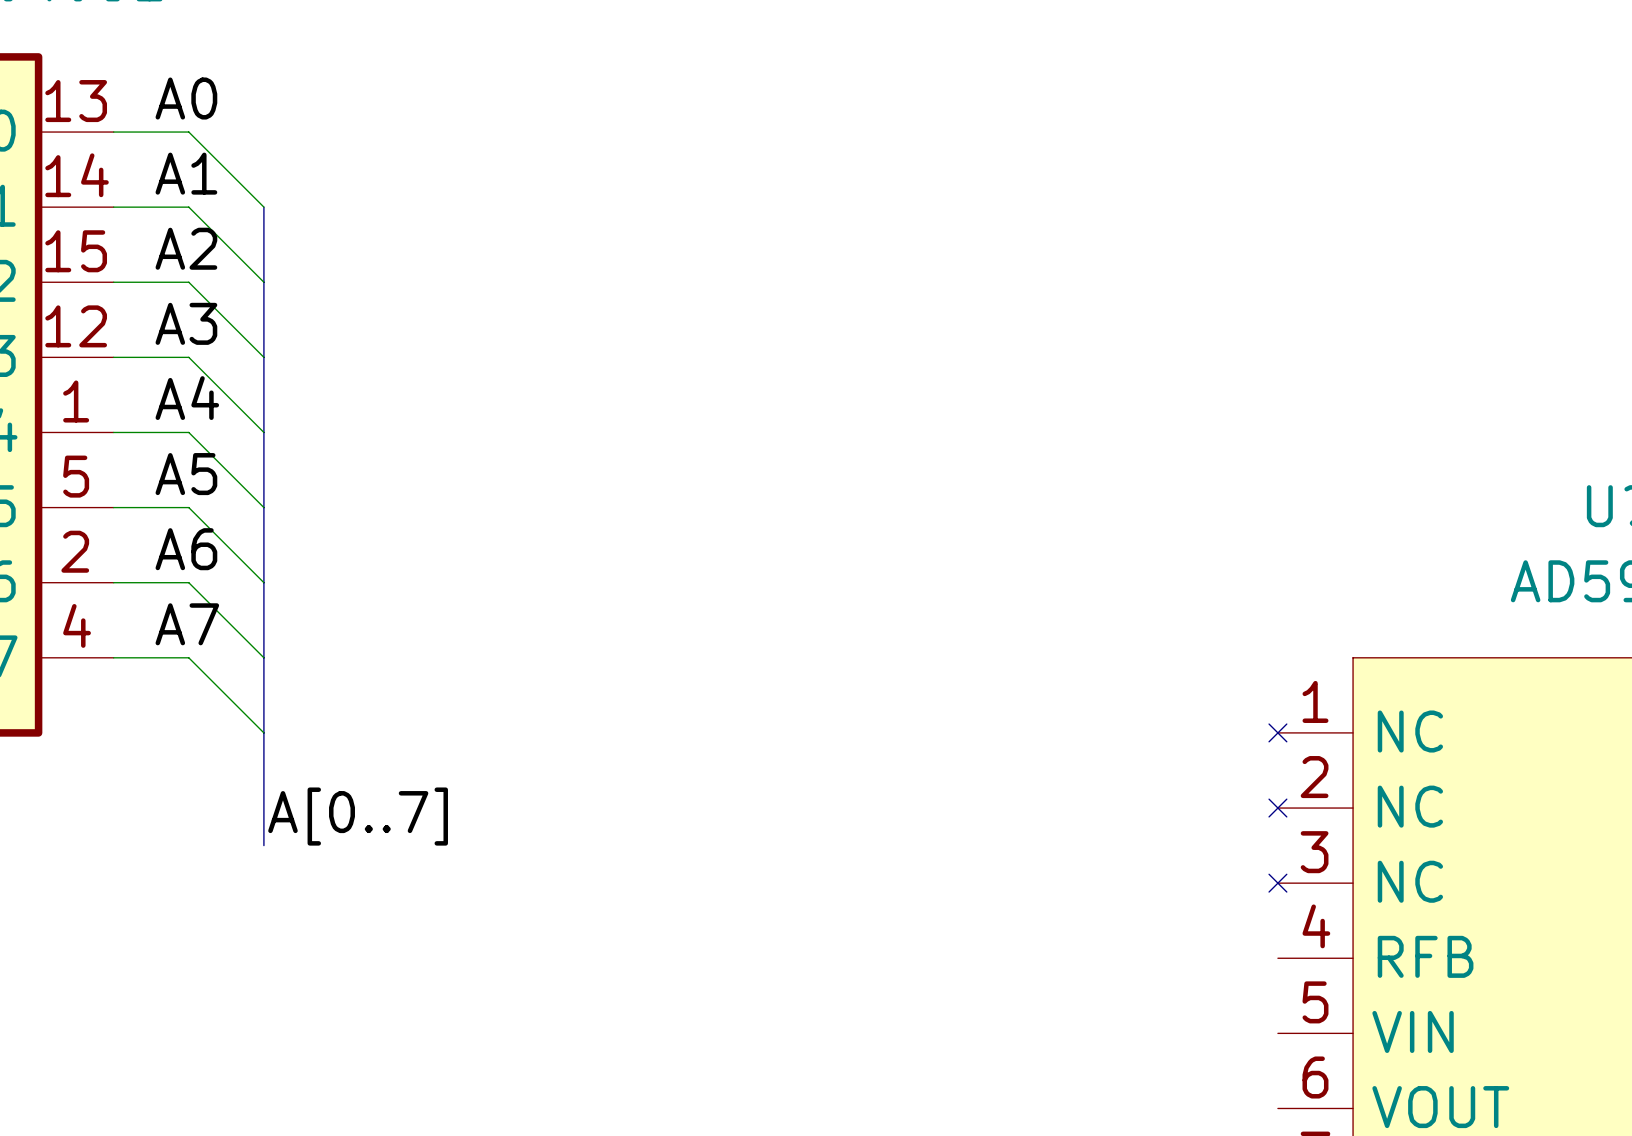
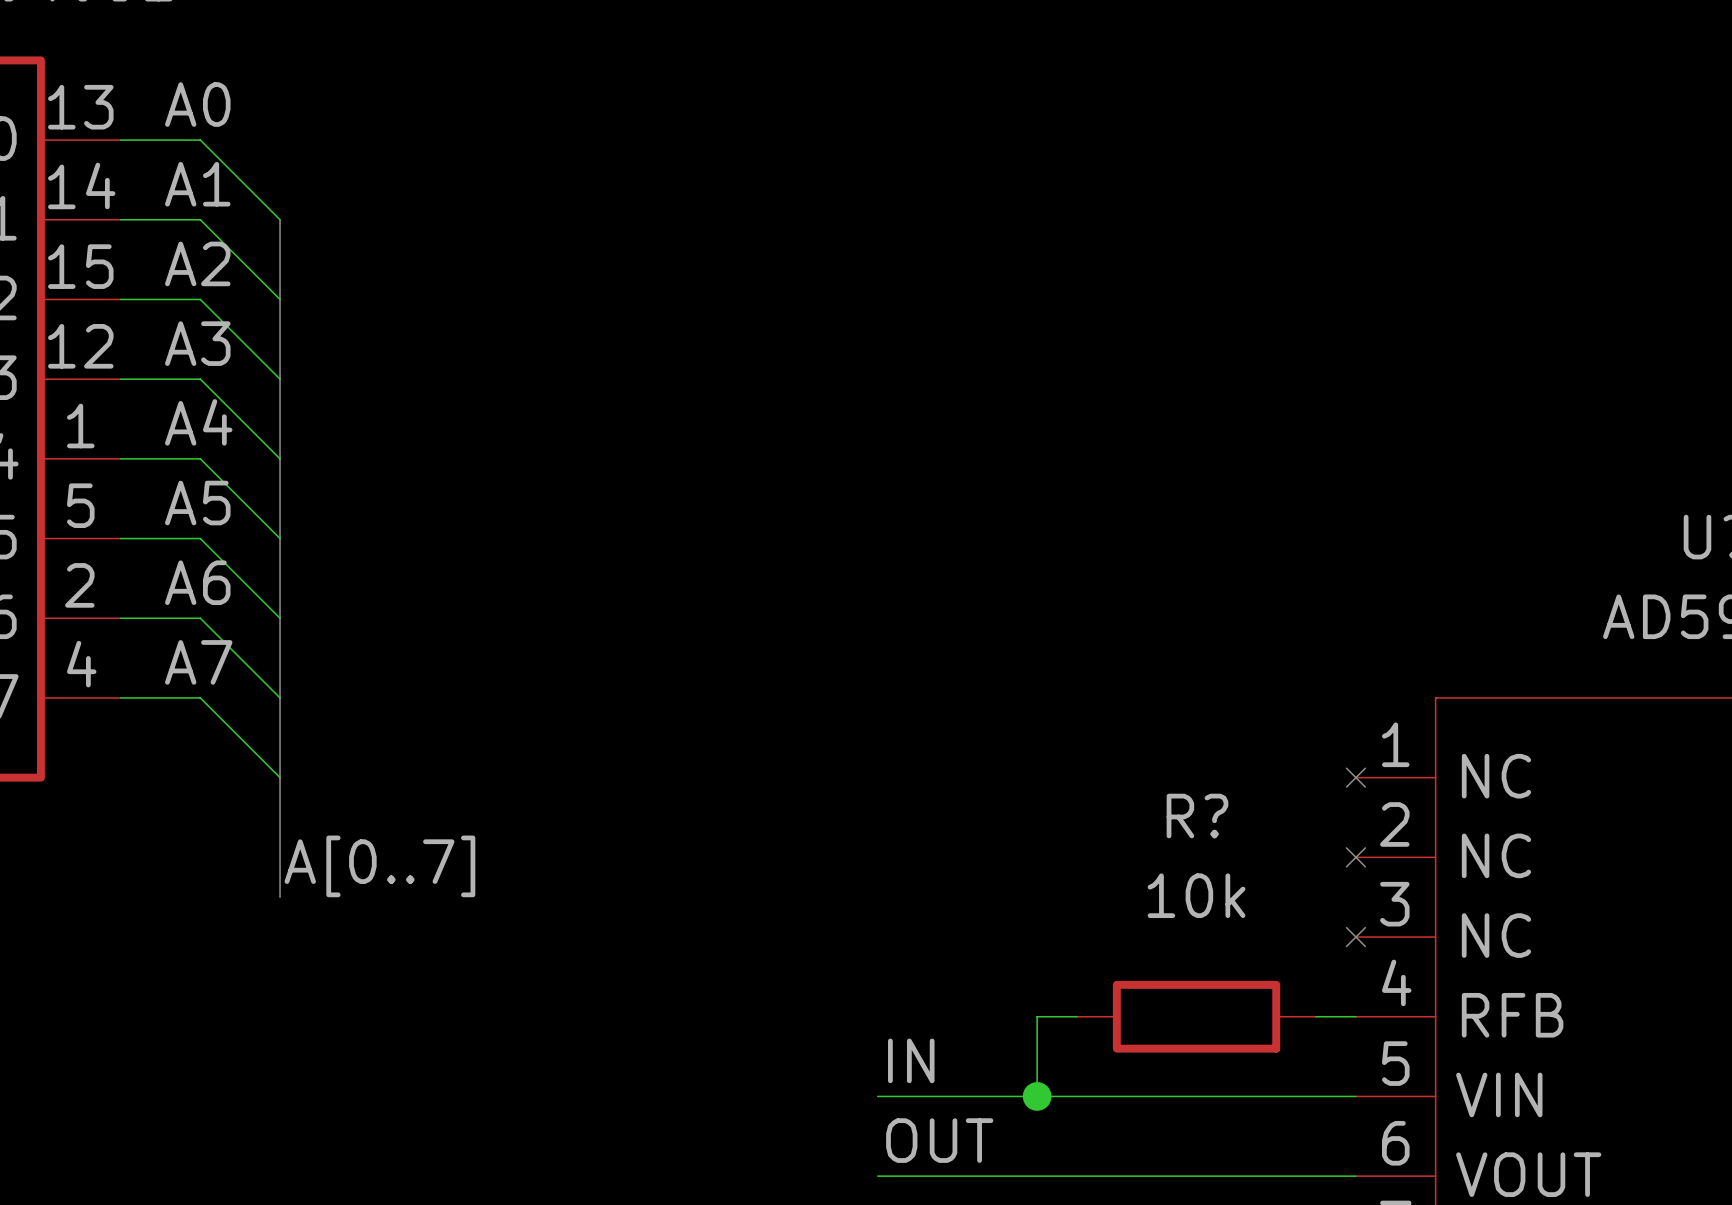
wire: none -> (1076, 1016) (1037, 1016) (1037, 1096)
R?: none -> 10k (1196, 1016)
wire: none -> (1316, 1016) (1355, 1016)
label: none -> IN (911, 1060)
wire: none -> (877, 1096) (1355, 1096)
junction: none -> (1037, 1096)
label: none -> OUT (939, 1140)
wire: none -> (877, 1176) (1355, 1176)

